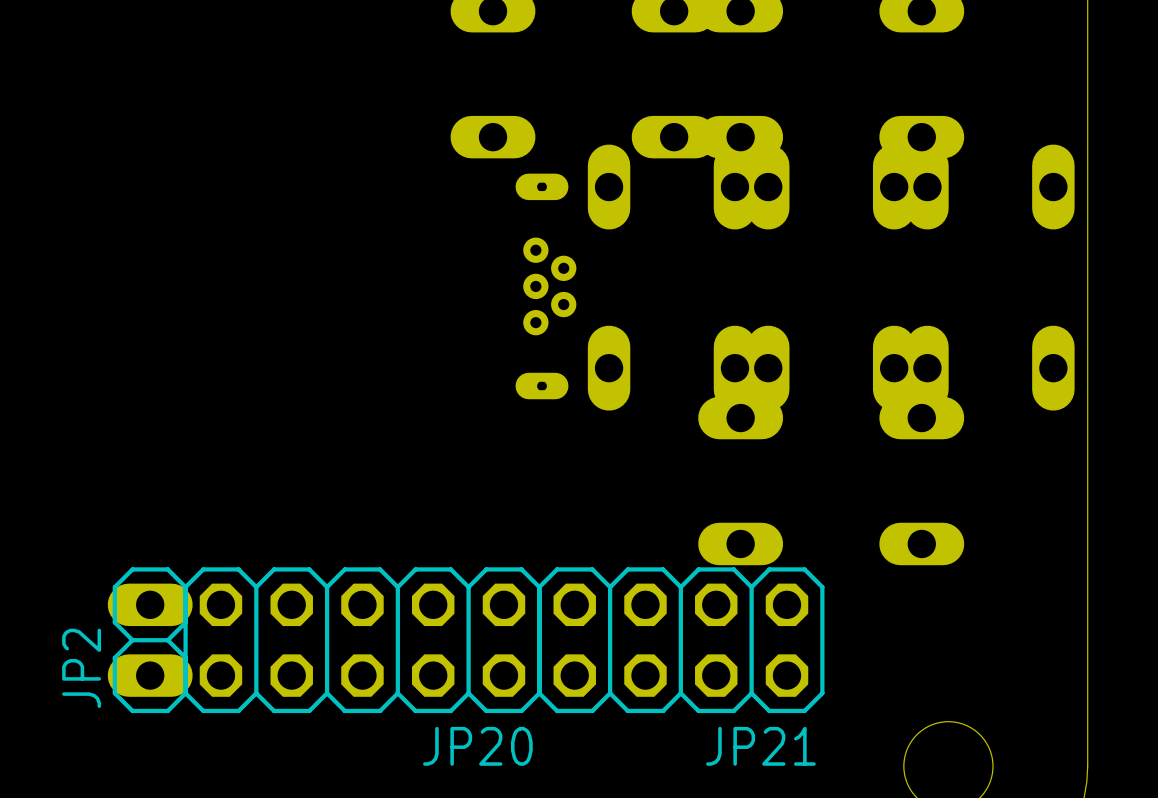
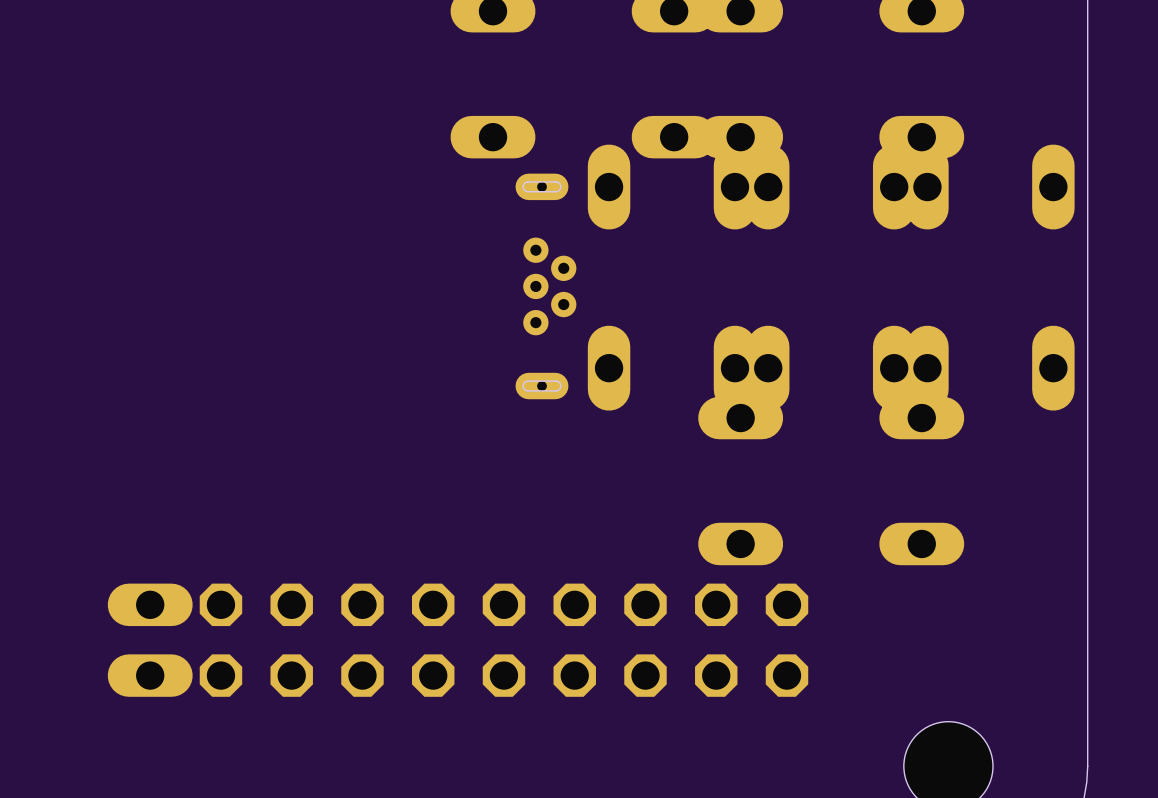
JP2 side: bottom (150, 640) -> top (150, 640)
JP20 side: bottom (362, 640) -> top (362, 640)
JP21 side: bottom (680, 640) -> top (680, 640)

